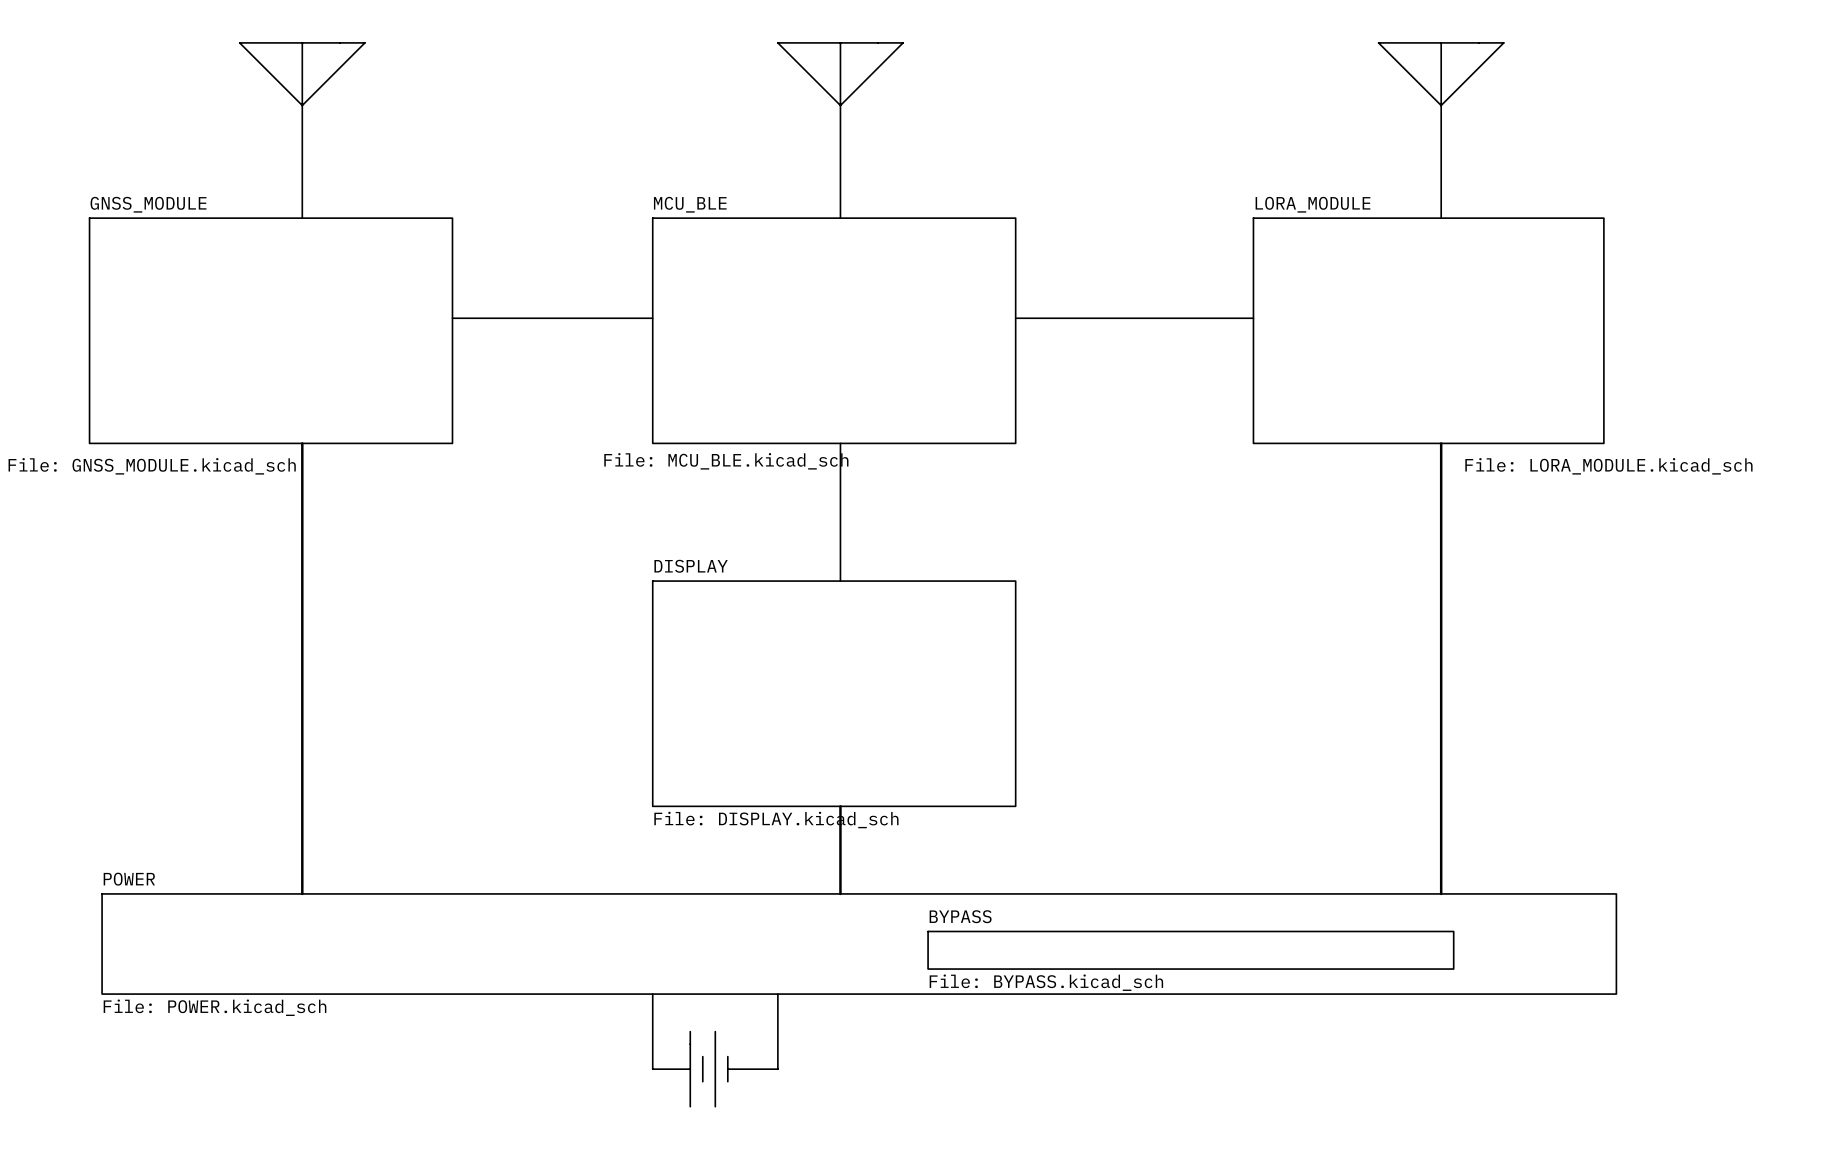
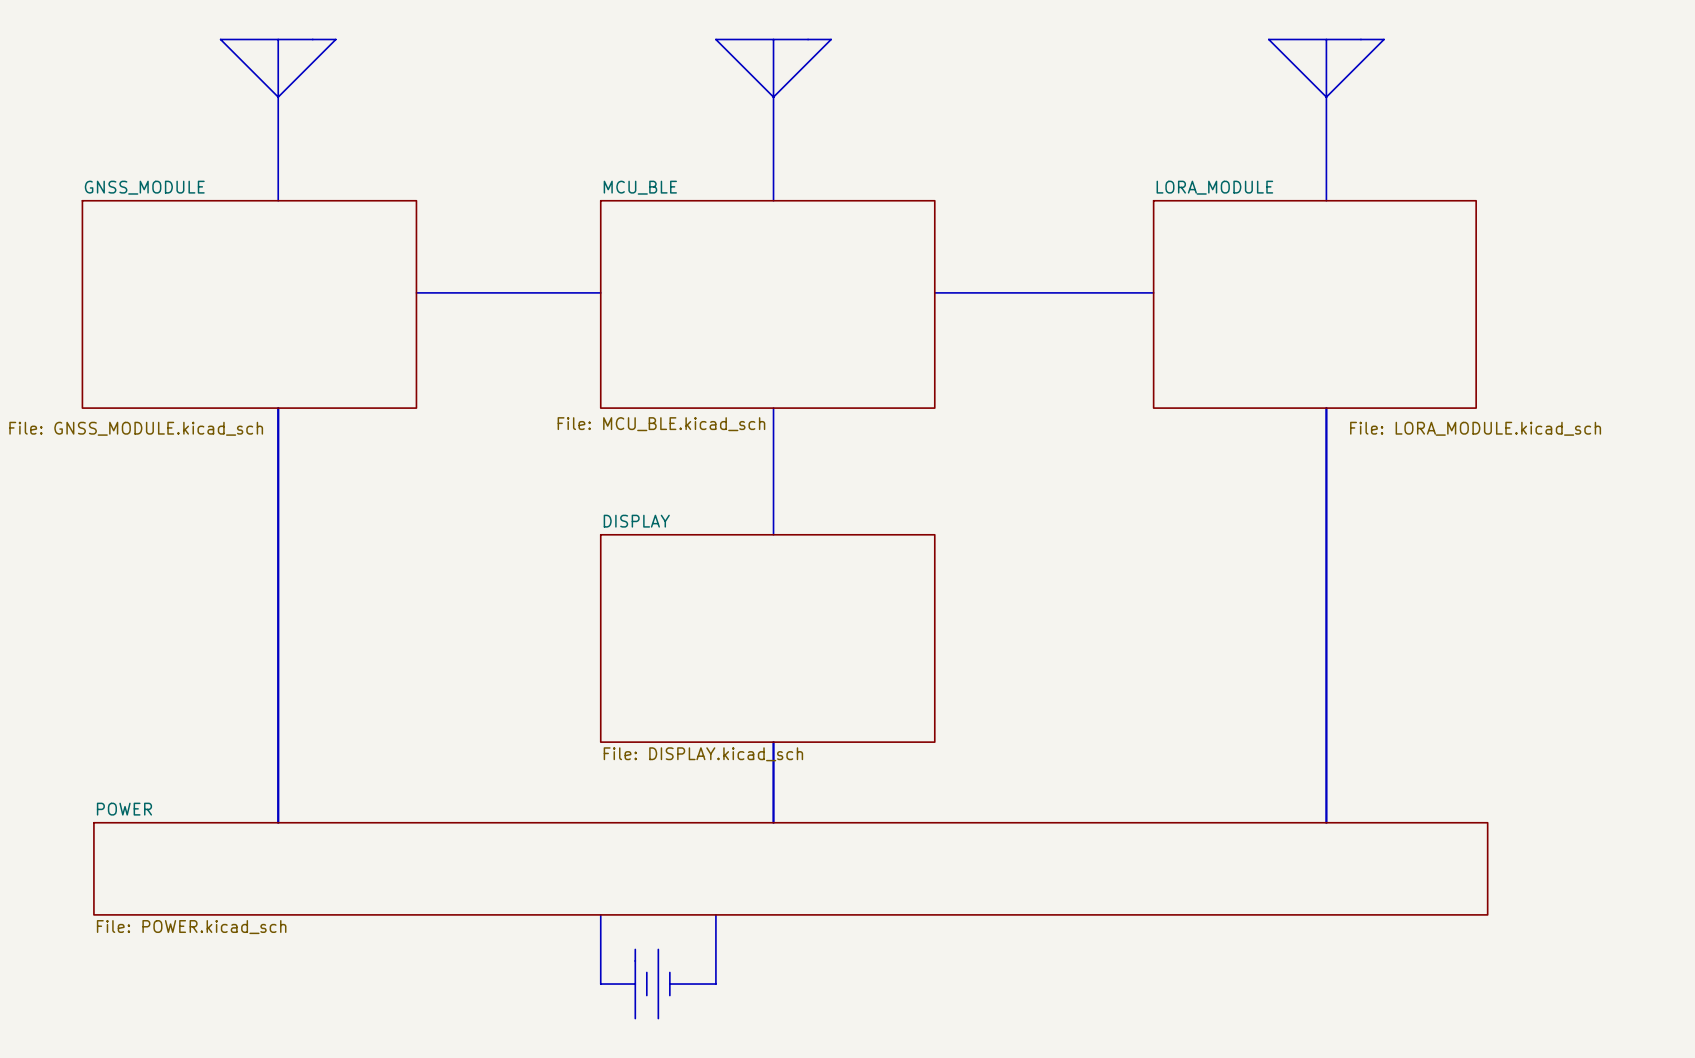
sheet BYPASS: File: BYPASS.kicad_sch (1190, 950) -> none

